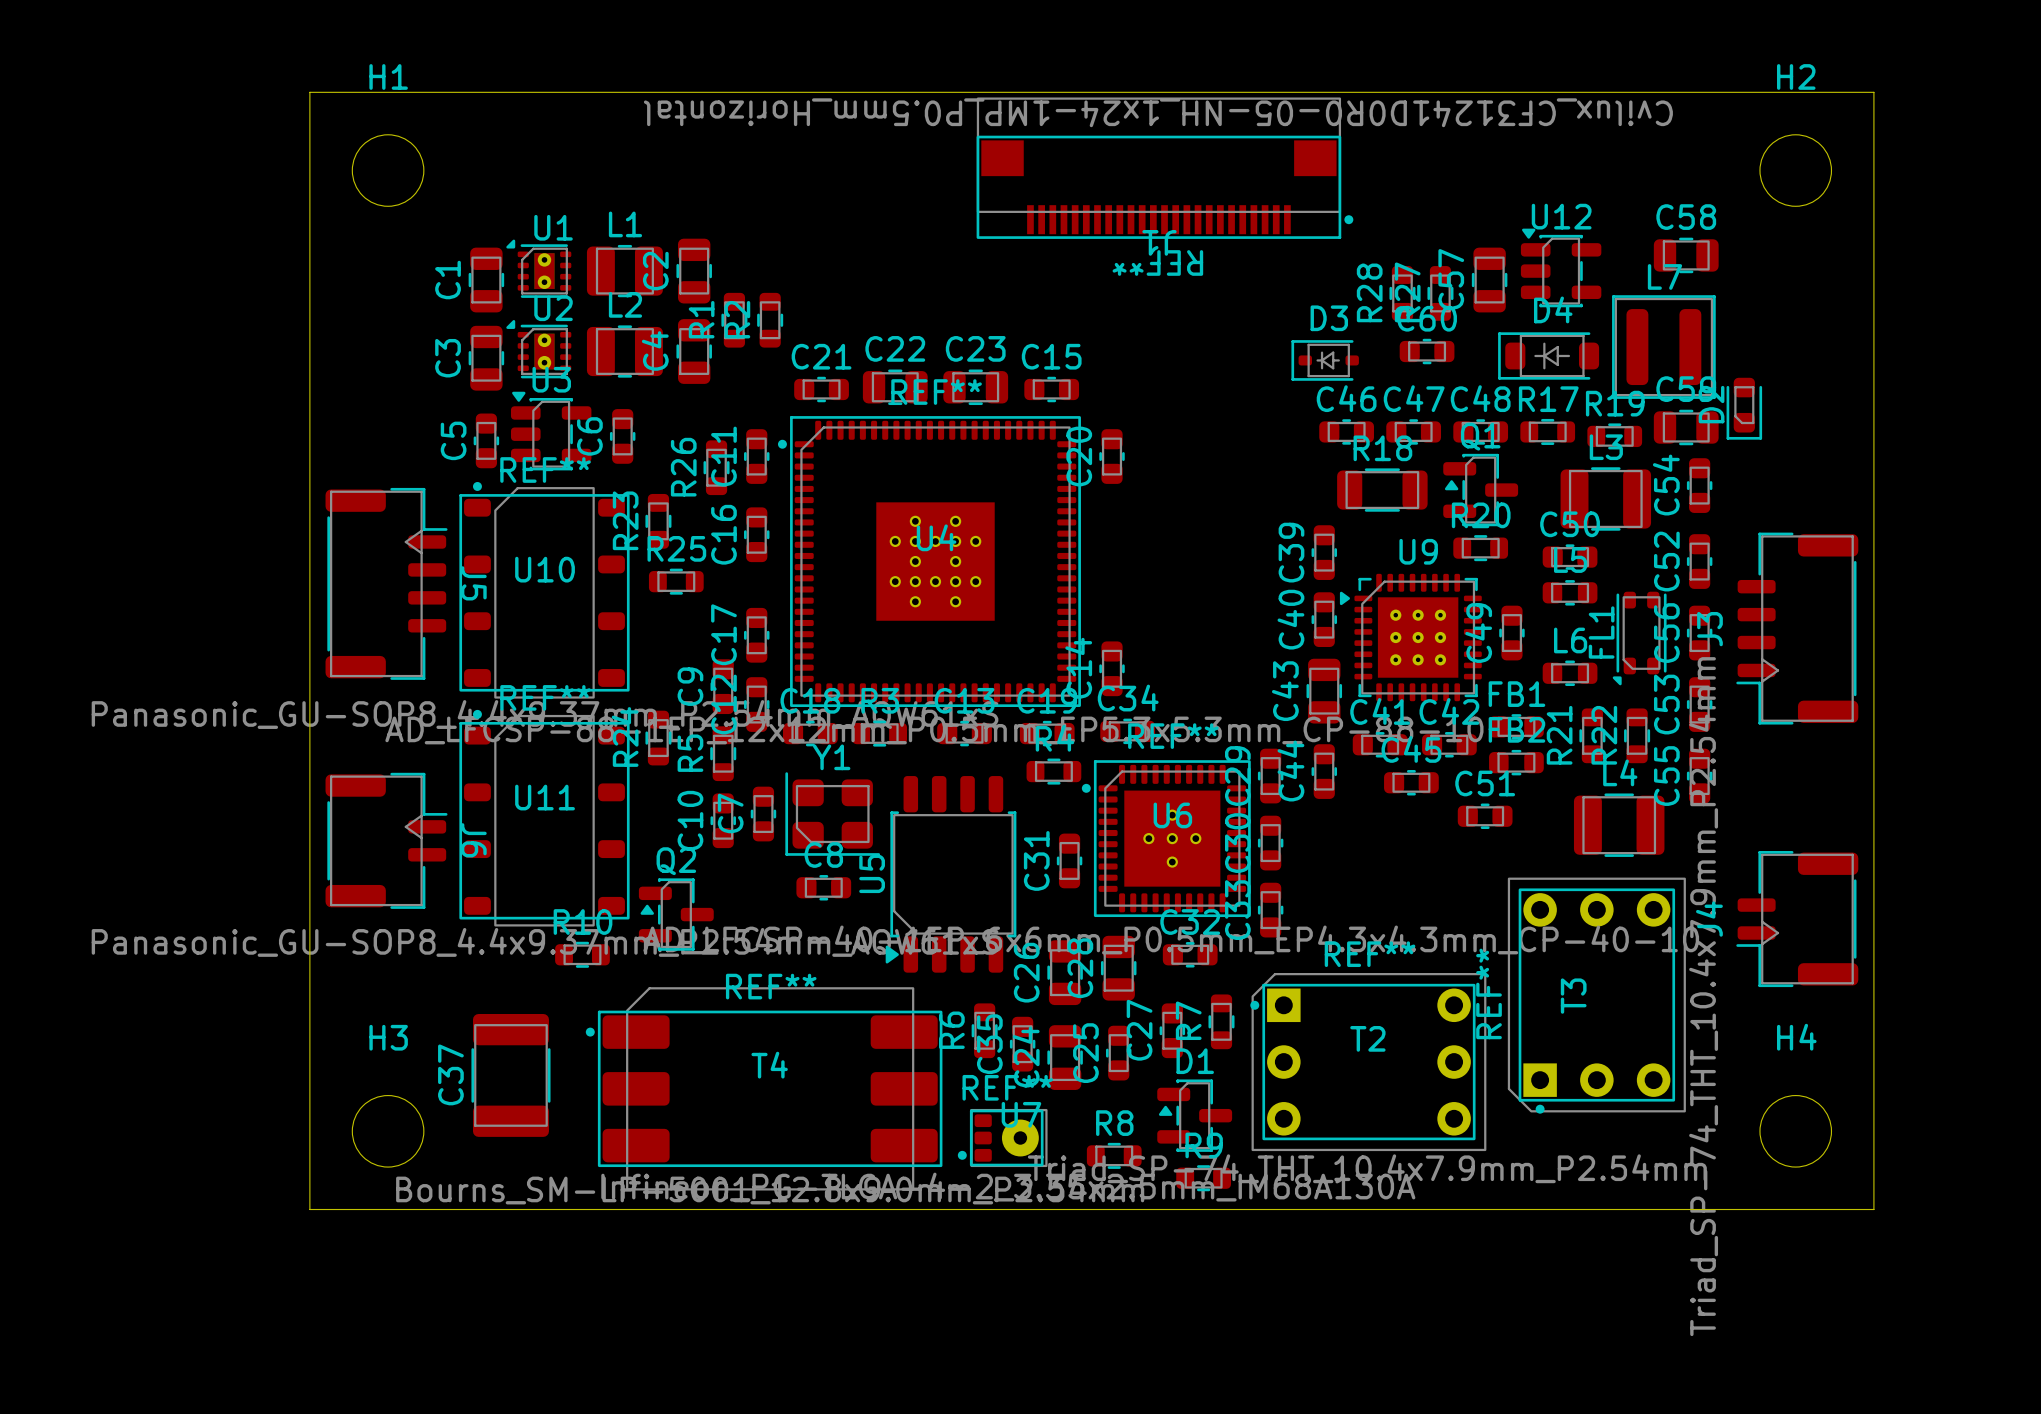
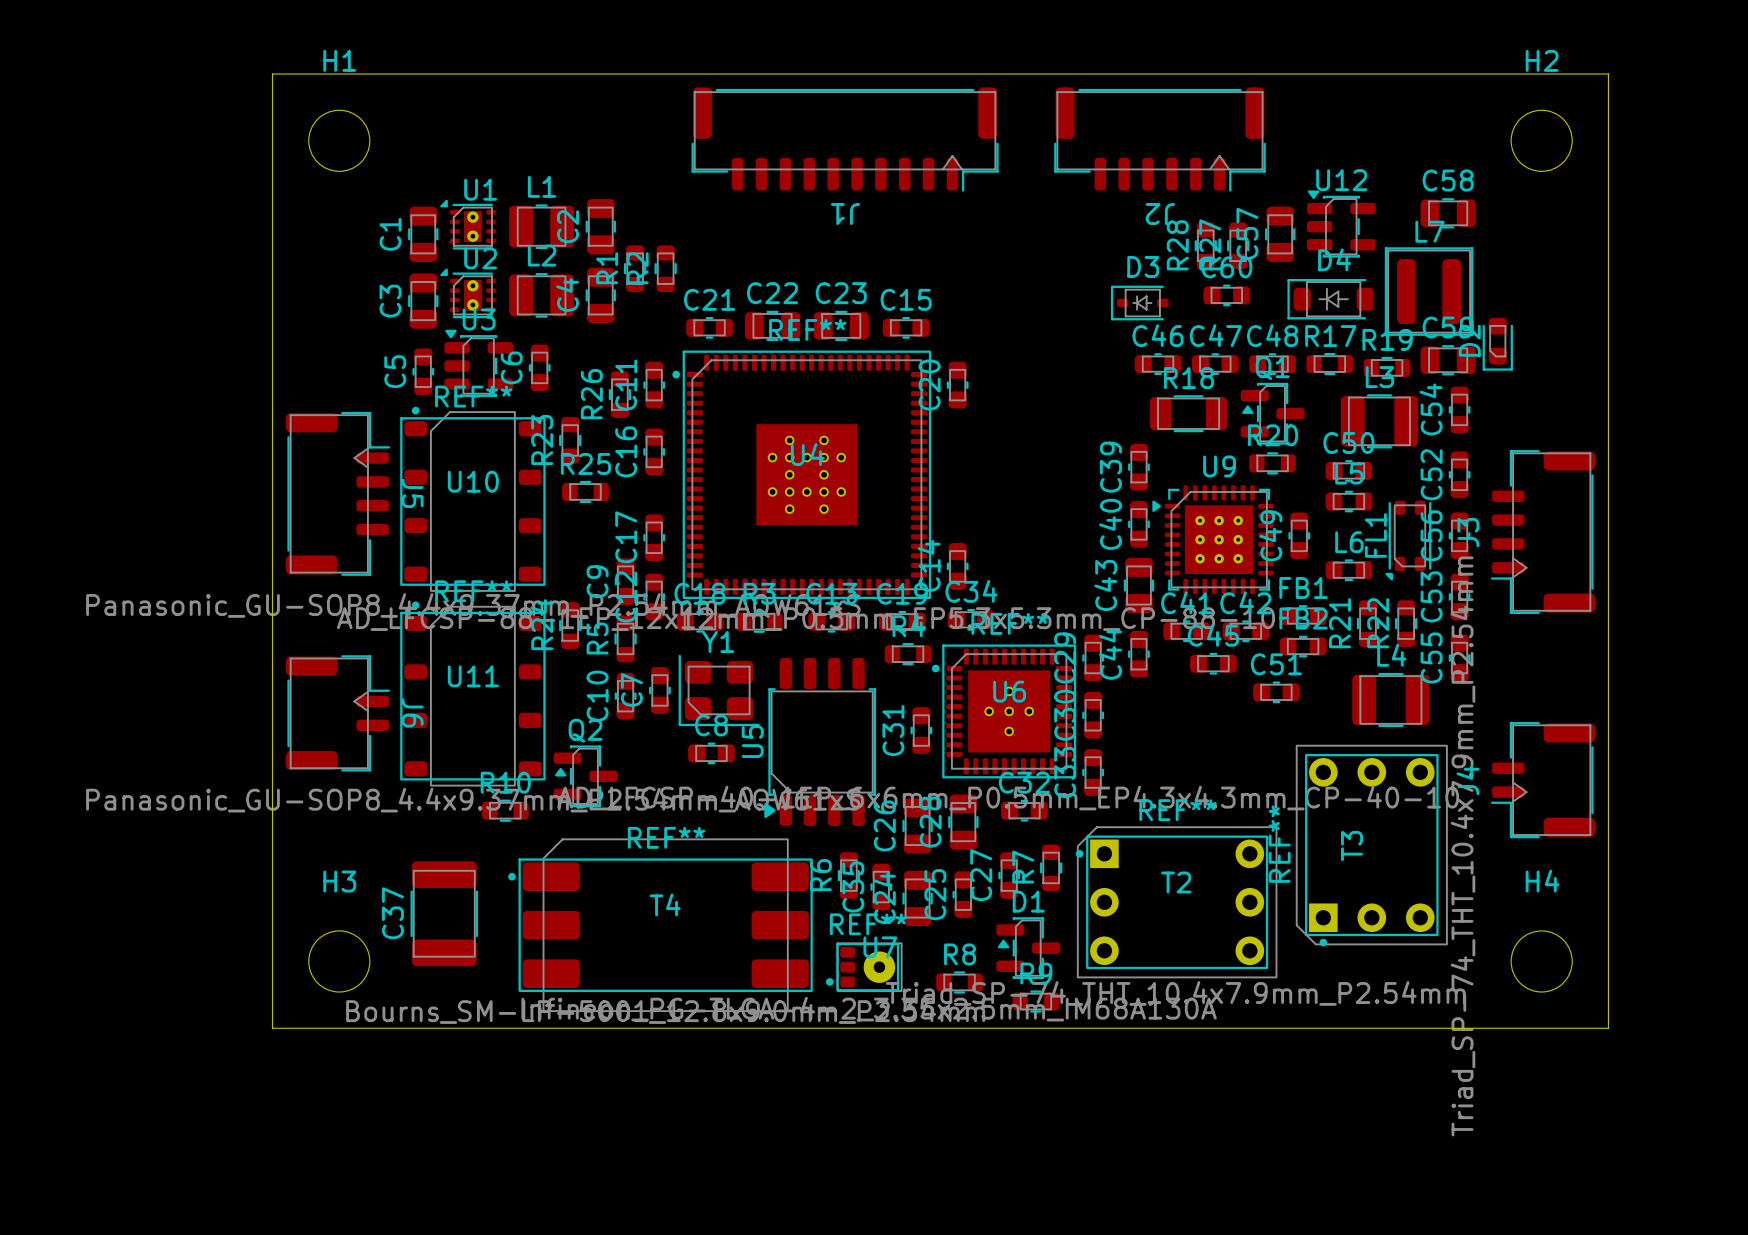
J1 footprint: [976, 97, 1354, 239] -> [691, 87, 999, 192]
J2: none -> (1159, 139)

